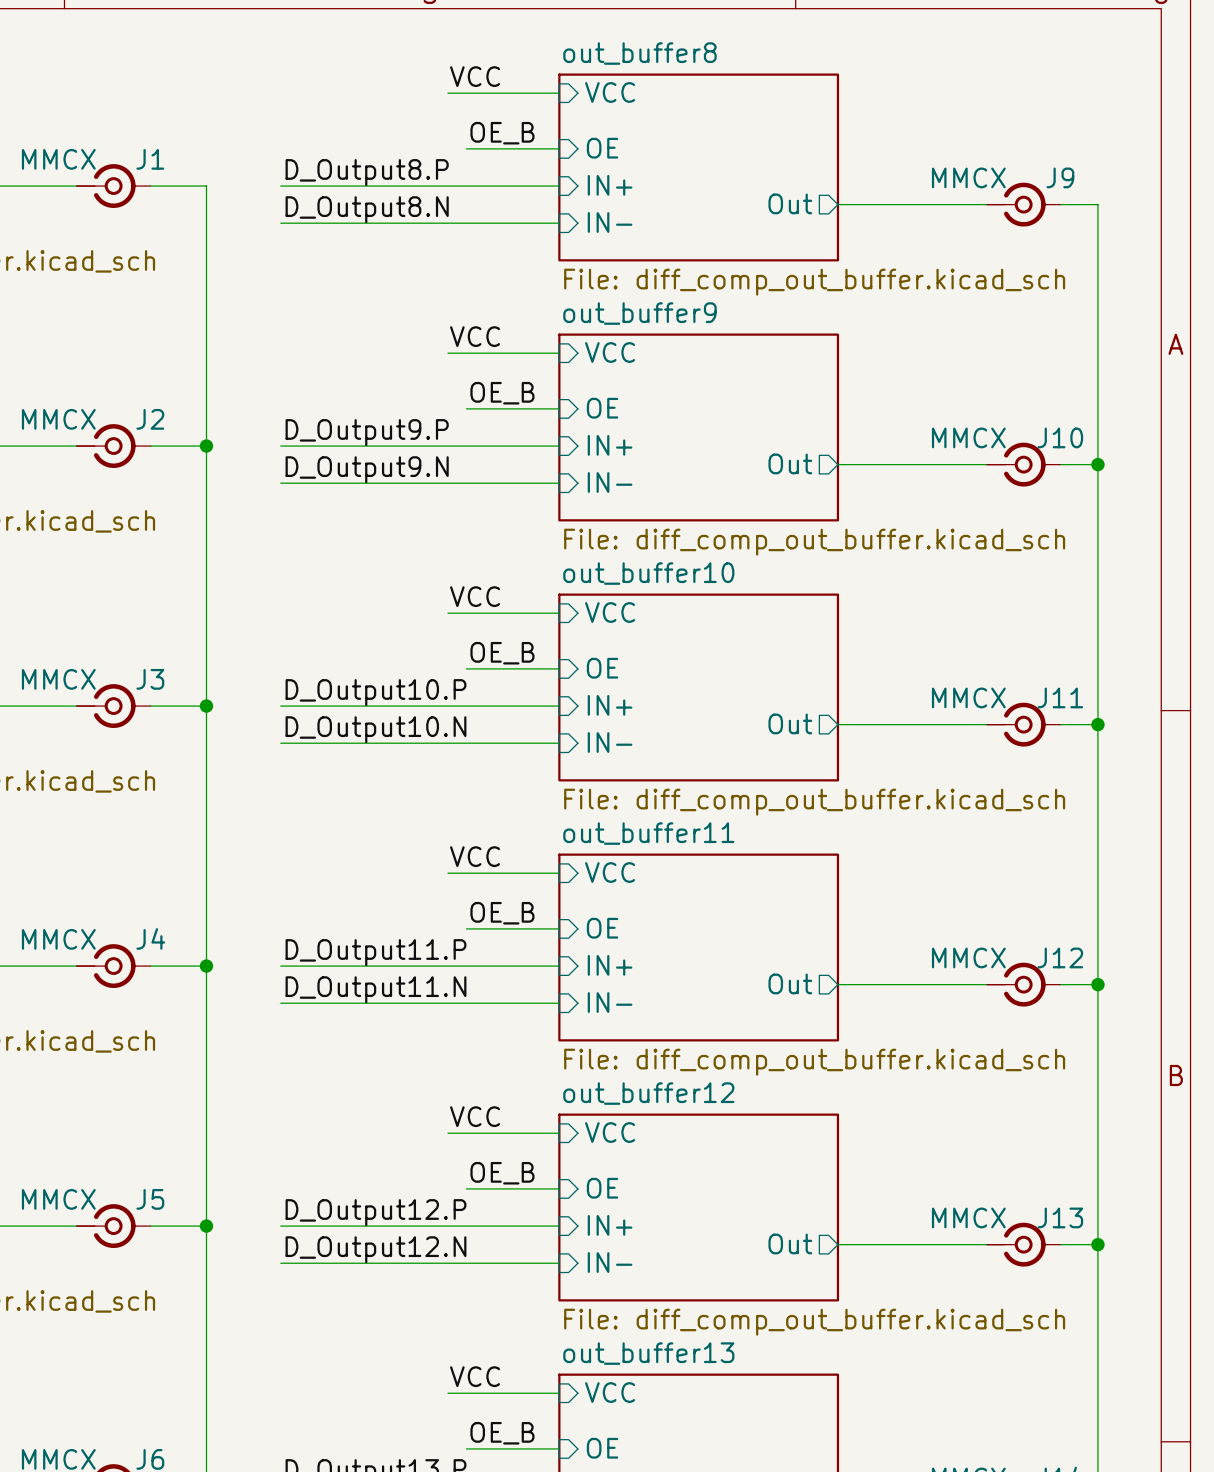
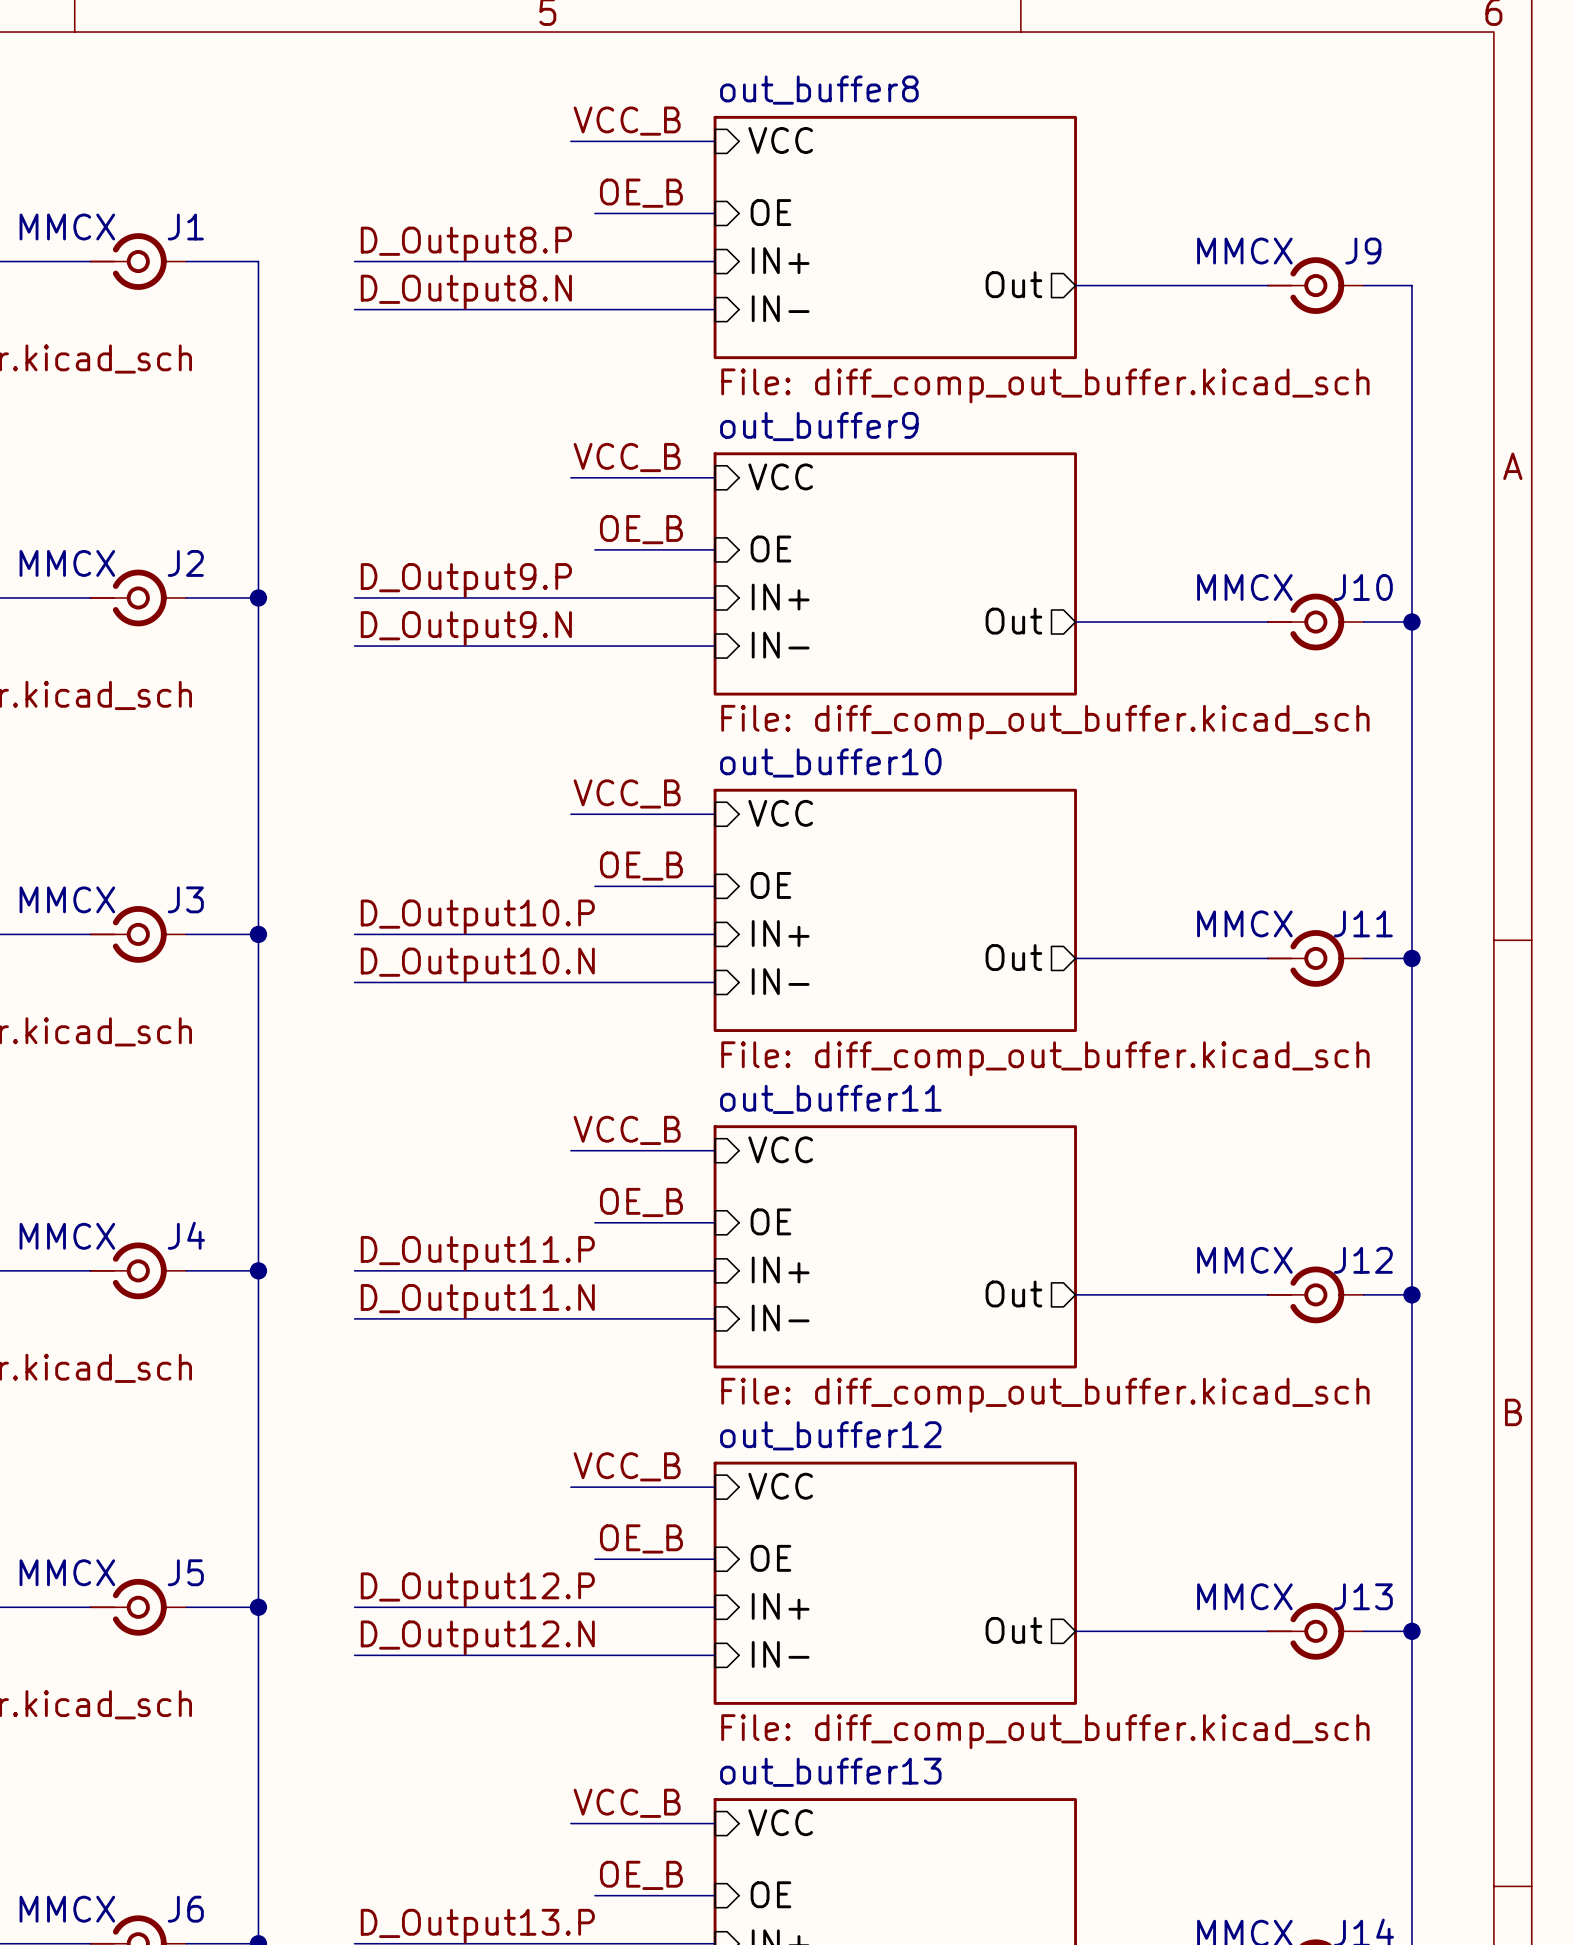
label: VCC (475, 76) -> VCC_B (627, 121)
label: VCC (475, 336) -> VCC_B (627, 457)
label: VCC (475, 596) -> VCC_B (627, 793)
label: VCC (475, 856) -> VCC_B (627, 1130)
label: VCC (475, 1116) -> VCC_B (627, 1466)
label: VCC (475, 1376) -> VCC_B (627, 1803)

